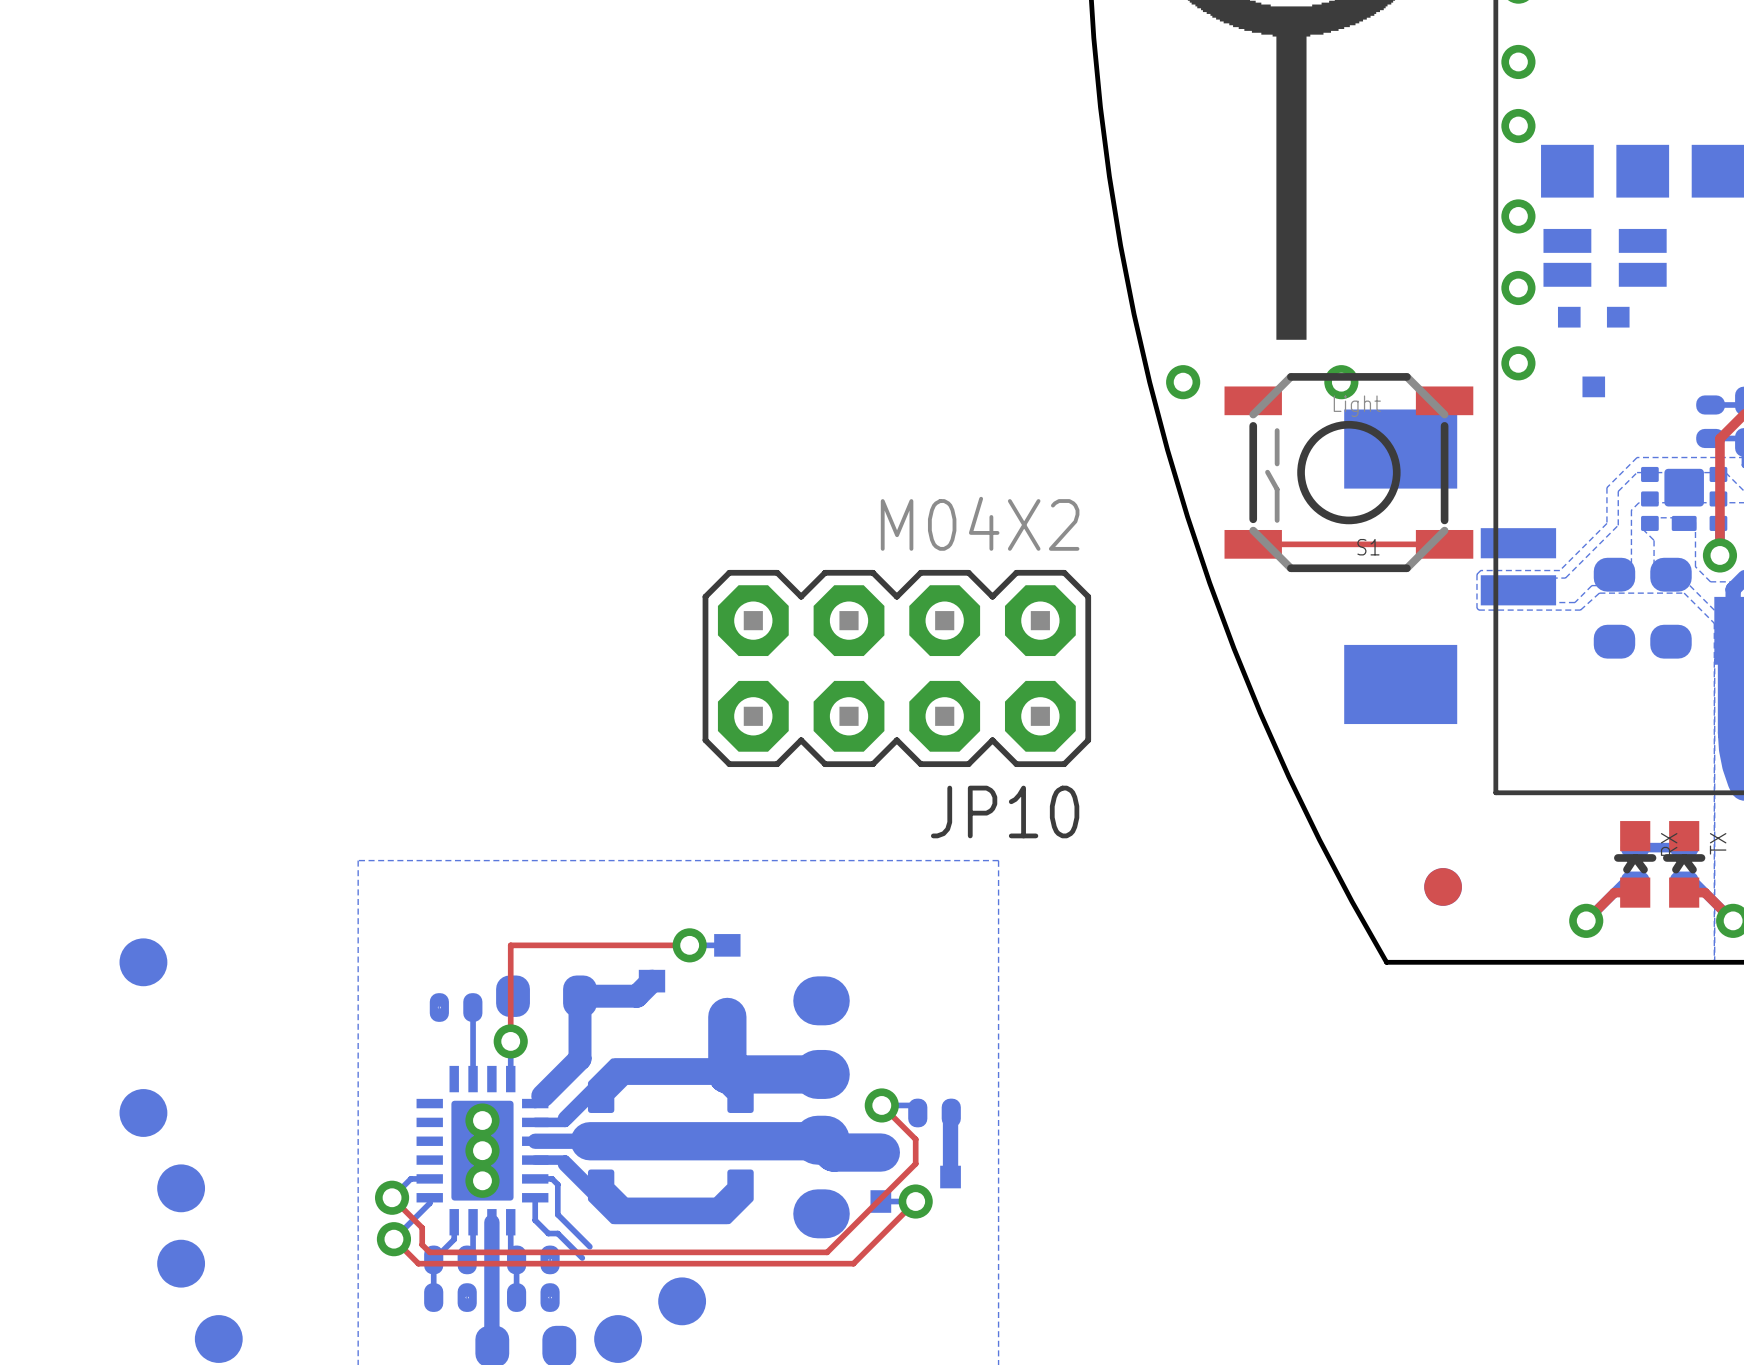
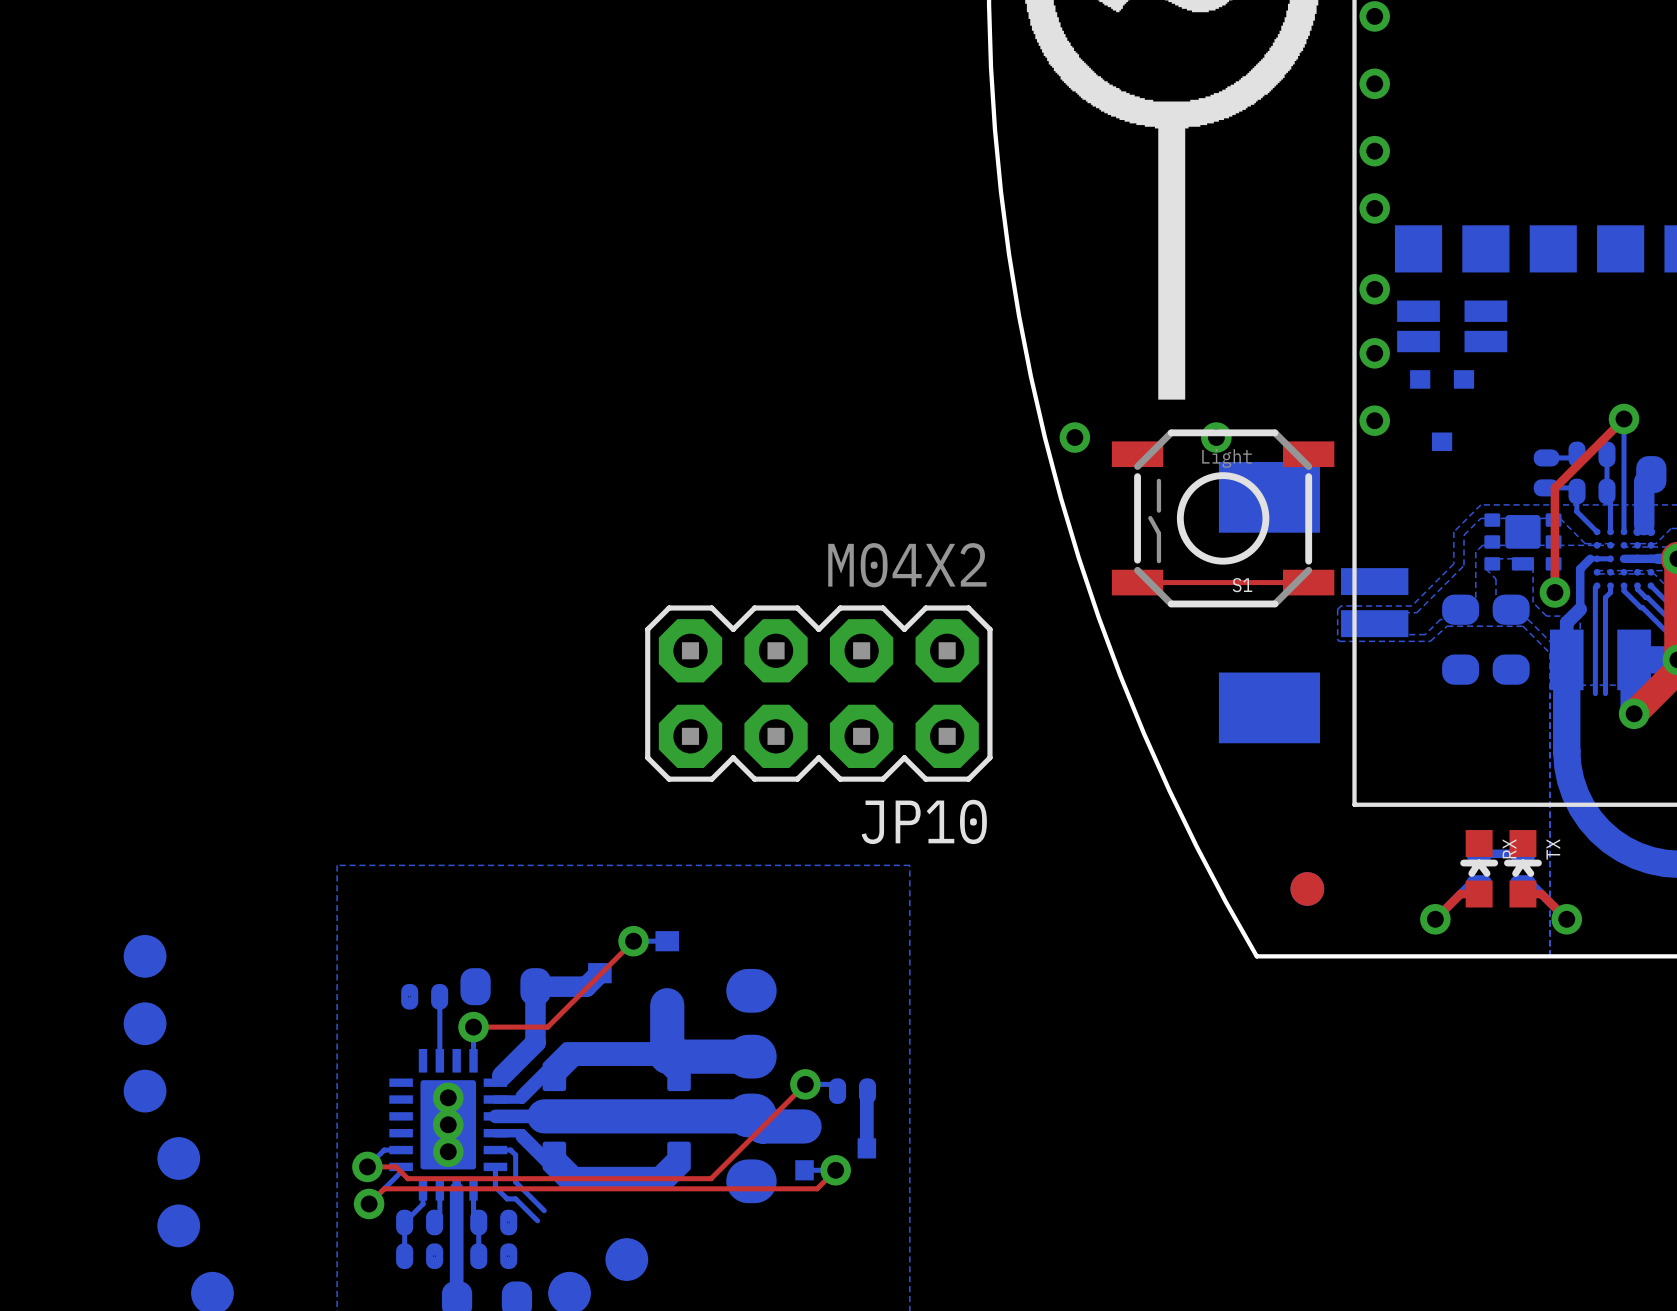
top track: (689, 945) (510, 945) (510, 1041) -> (633, 941) (547, 1027) (473, 1027)
part: none -> (145, 1023)
top track: (881, 1105) (915, 1139) (915, 1163) (827, 1252) (429, 1252) (422, 1244) (422, 1227) (392, 1197) -> (805, 1084) (711, 1178) (407, 1178) (396, 1166) (367, 1166)
top track: (894, 1222) (853, 1263) (418, 1263) (393, 1239) -> (817, 1188) (384, 1188) (369, 1203)

